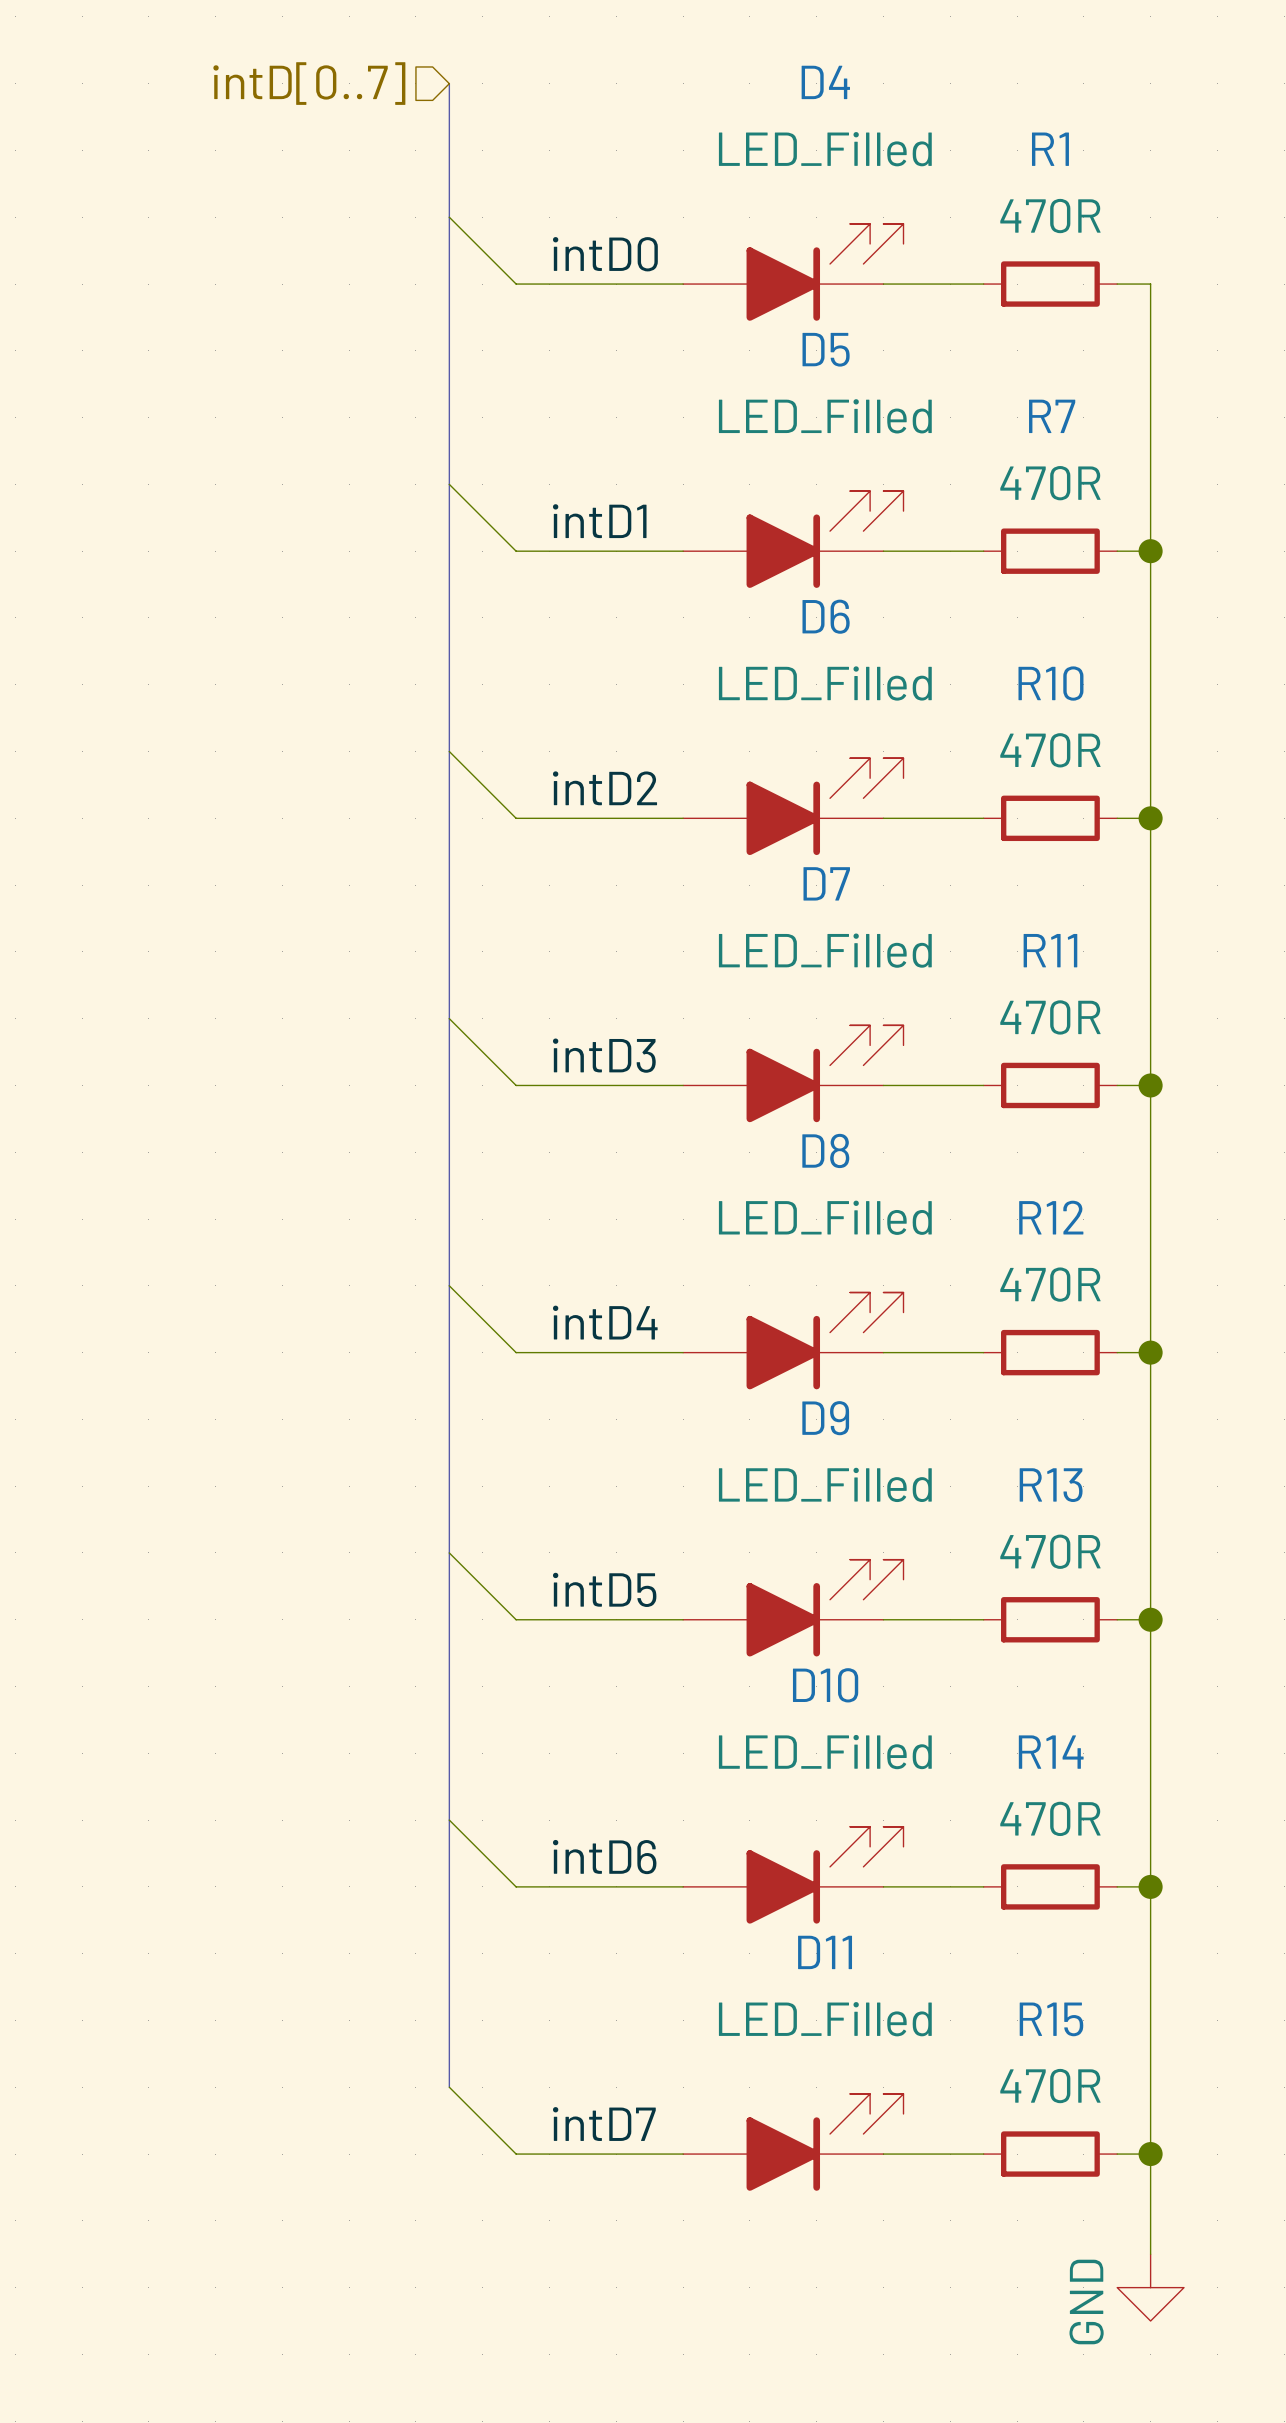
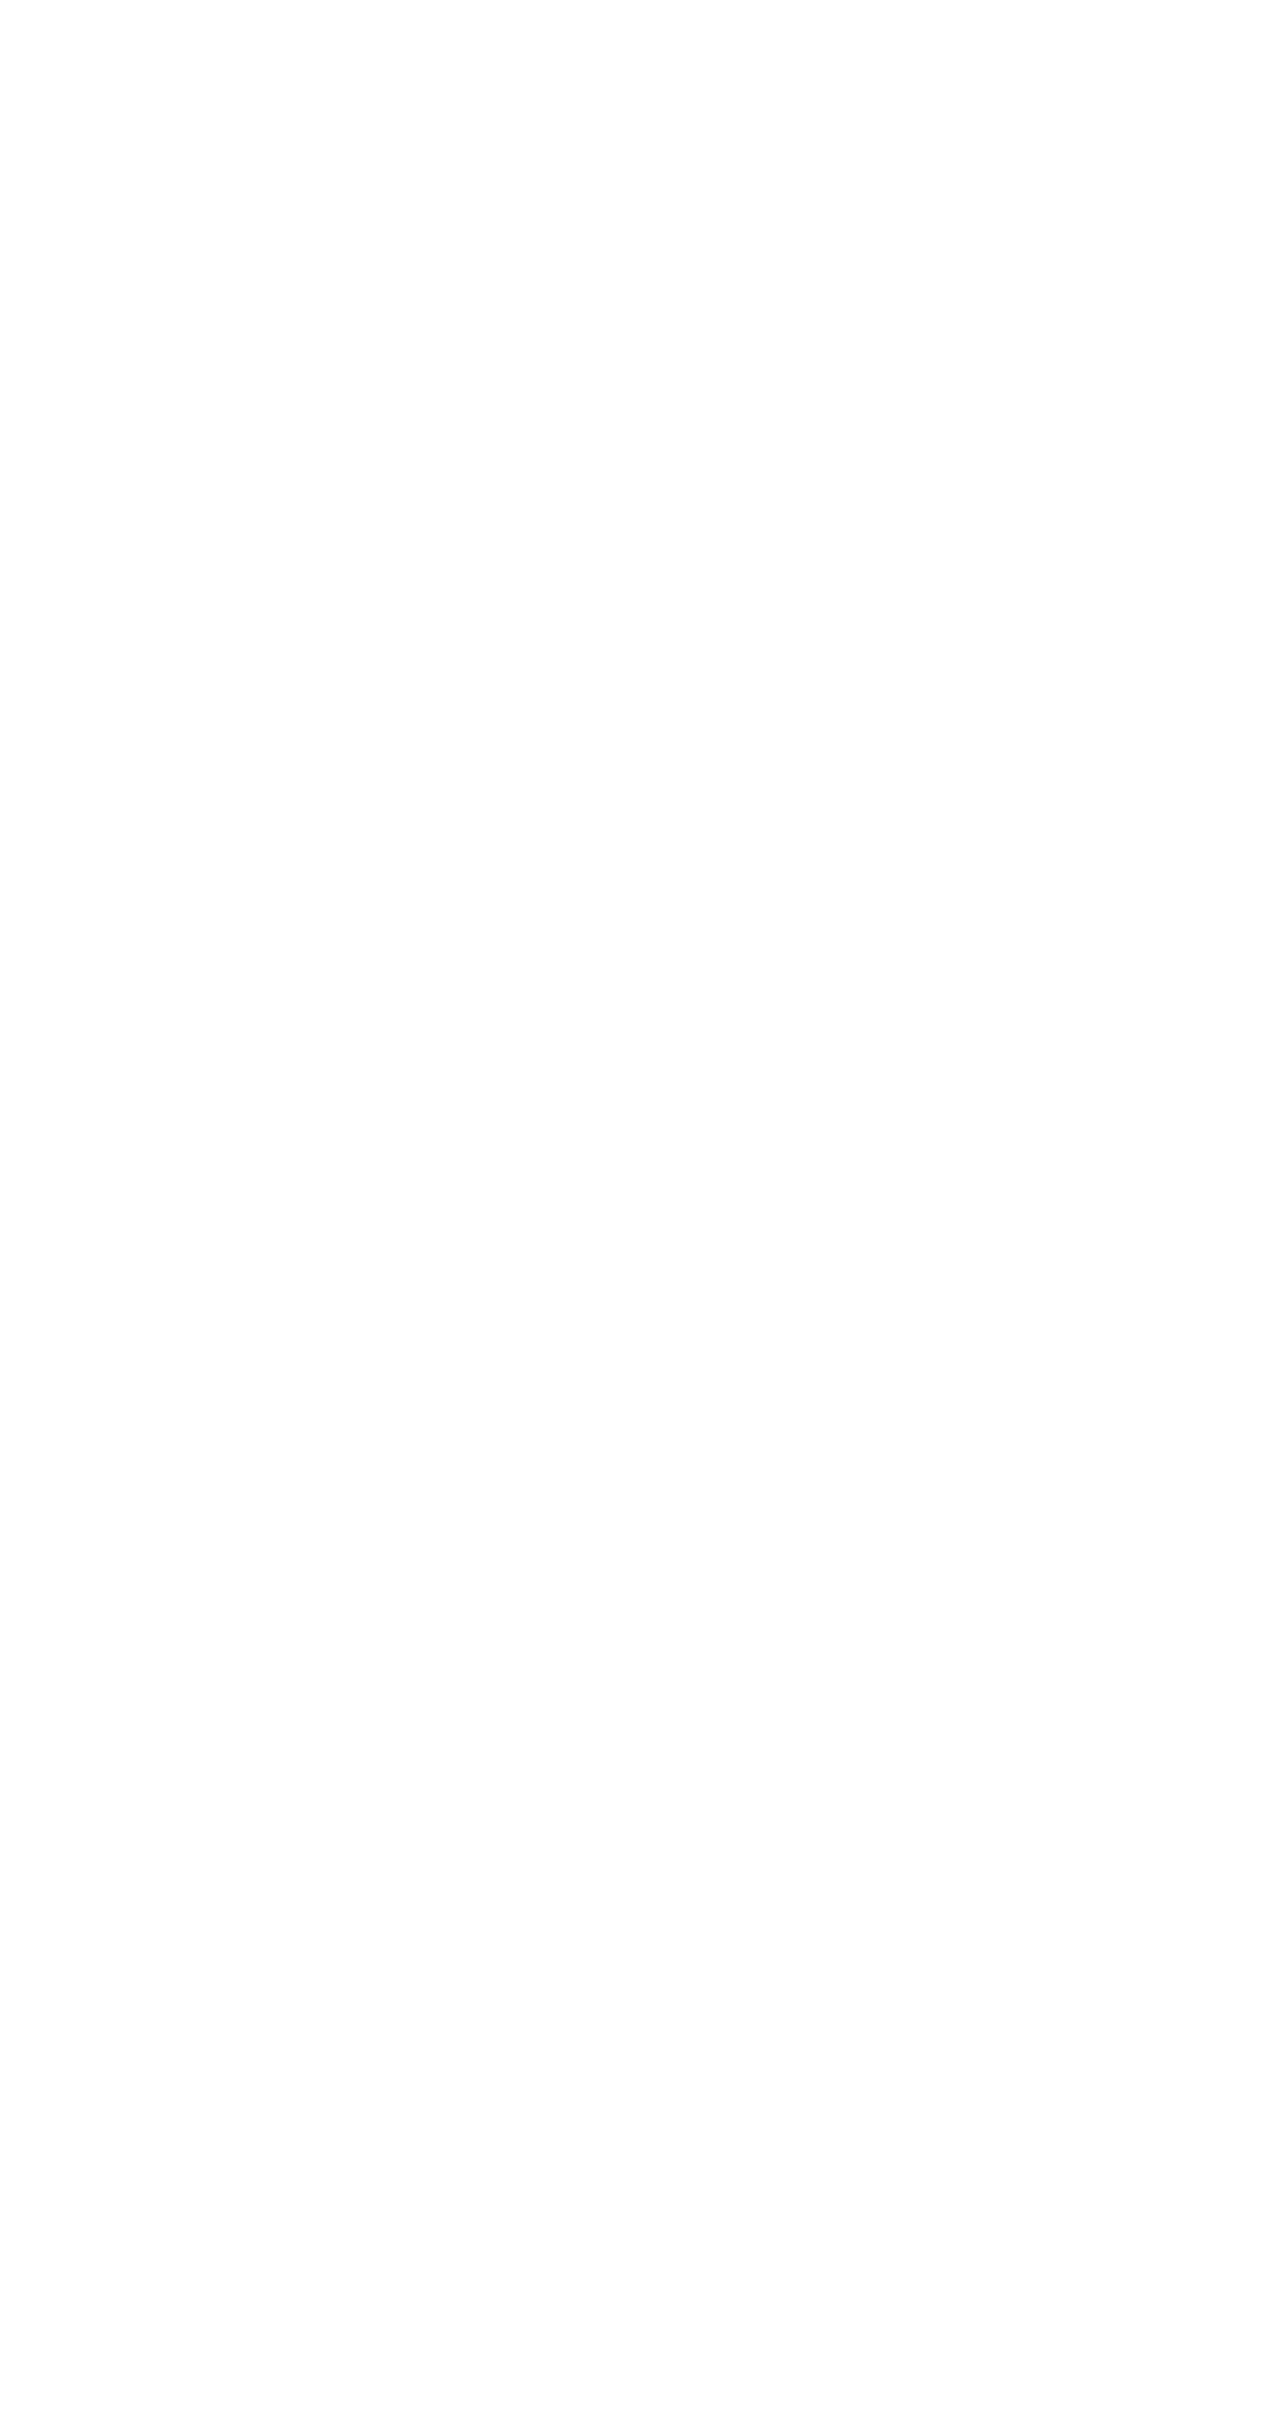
hierarchical label: intD[0..7] (309, 83) -> none
bus: (449, 83) (449, 2087) -> none
wire: (449, 217) (516, 284) (683, 284) -> none
label: intD0 (605, 254) -> none
D4: LED_Filled (793, 272) -> none
wire: (883, 284) (983, 284) -> none
R1: 470R (1050, 284) -> none
wire: (1117, 284) (1150, 284) (1150, 2254) -> none
wire: (449, 484) (516, 551) (683, 551) -> none
label: intD1 (599, 521) -> none
D5: LED_Filled (793, 539) -> none
wire: (883, 551) (983, 551) -> none
R7: 470R (1050, 551) -> none
wire: (1117, 551) (1150, 551) -> none
junction: (1150, 551) -> none
wire: (449, 751) (516, 818) (683, 818) -> none
label: intD2 (605, 788) -> none
D6: LED_Filled (793, 806) -> none
wire: (883, 818) (983, 818) -> none
R10: 470R (1050, 818) -> none
wire: (1117, 818) (1150, 818) -> none
junction: (1150, 818) -> none
wire: (449, 1018) (516, 1085) (683, 1085) -> none
label: intD3 (604, 1055) -> none
D7: LED_Filled (793, 1073) -> none
wire: (883, 1085) (983, 1085) -> none
R11: 470R (1050, 1085) -> none
wire: (1117, 1085) (1150, 1085) -> none
junction: (1150, 1085) -> none
wire: (449, 1285) (516, 1352) (683, 1352) -> none
label: intD4 (605, 1322) -> none
D8: LED_Filled (793, 1340) -> none
wire: (883, 1352) (983, 1352) -> none
R12: 470R (1050, 1352) -> none
wire: (1117, 1352) (1150, 1352) -> none
junction: (1150, 1352) -> none
wire: (449, 1552) (516, 1619) (683, 1619) -> none
label: intD5 (604, 1589) -> none
D9: LED_Filled (793, 1608) -> none
wire: (883, 1619) (983, 1619) -> none
R13: 470R (1050, 1619) -> none
wire: (1117, 1619) (1150, 1619) -> none
junction: (1150, 1619) -> none
wire: (449, 1820) (516, 1886) (683, 1886) -> none
label: intD6 (604, 1857) -> none
D10: LED_Filled (793, 1875) -> none
wire: (883, 1886) (983, 1886) -> none
R14: 470R (1050, 1886) -> none
wire: (1117, 1886) (1150, 1886) -> none
junction: (1150, 1886) -> none
wire: (449, 2087) (516, 2154) (683, 2154) -> none
label: intD7 (604, 2124) -> none
D11: LED_Filled (793, 2142) -> none
wire: (883, 2154) (983, 2154) -> none
R15: 470R (1050, 2154) -> none
wire: (1117, 2154) (1150, 2154) -> none
junction: (1150, 2154) -> none
power symbol: GND (1150, 2287) -> none

